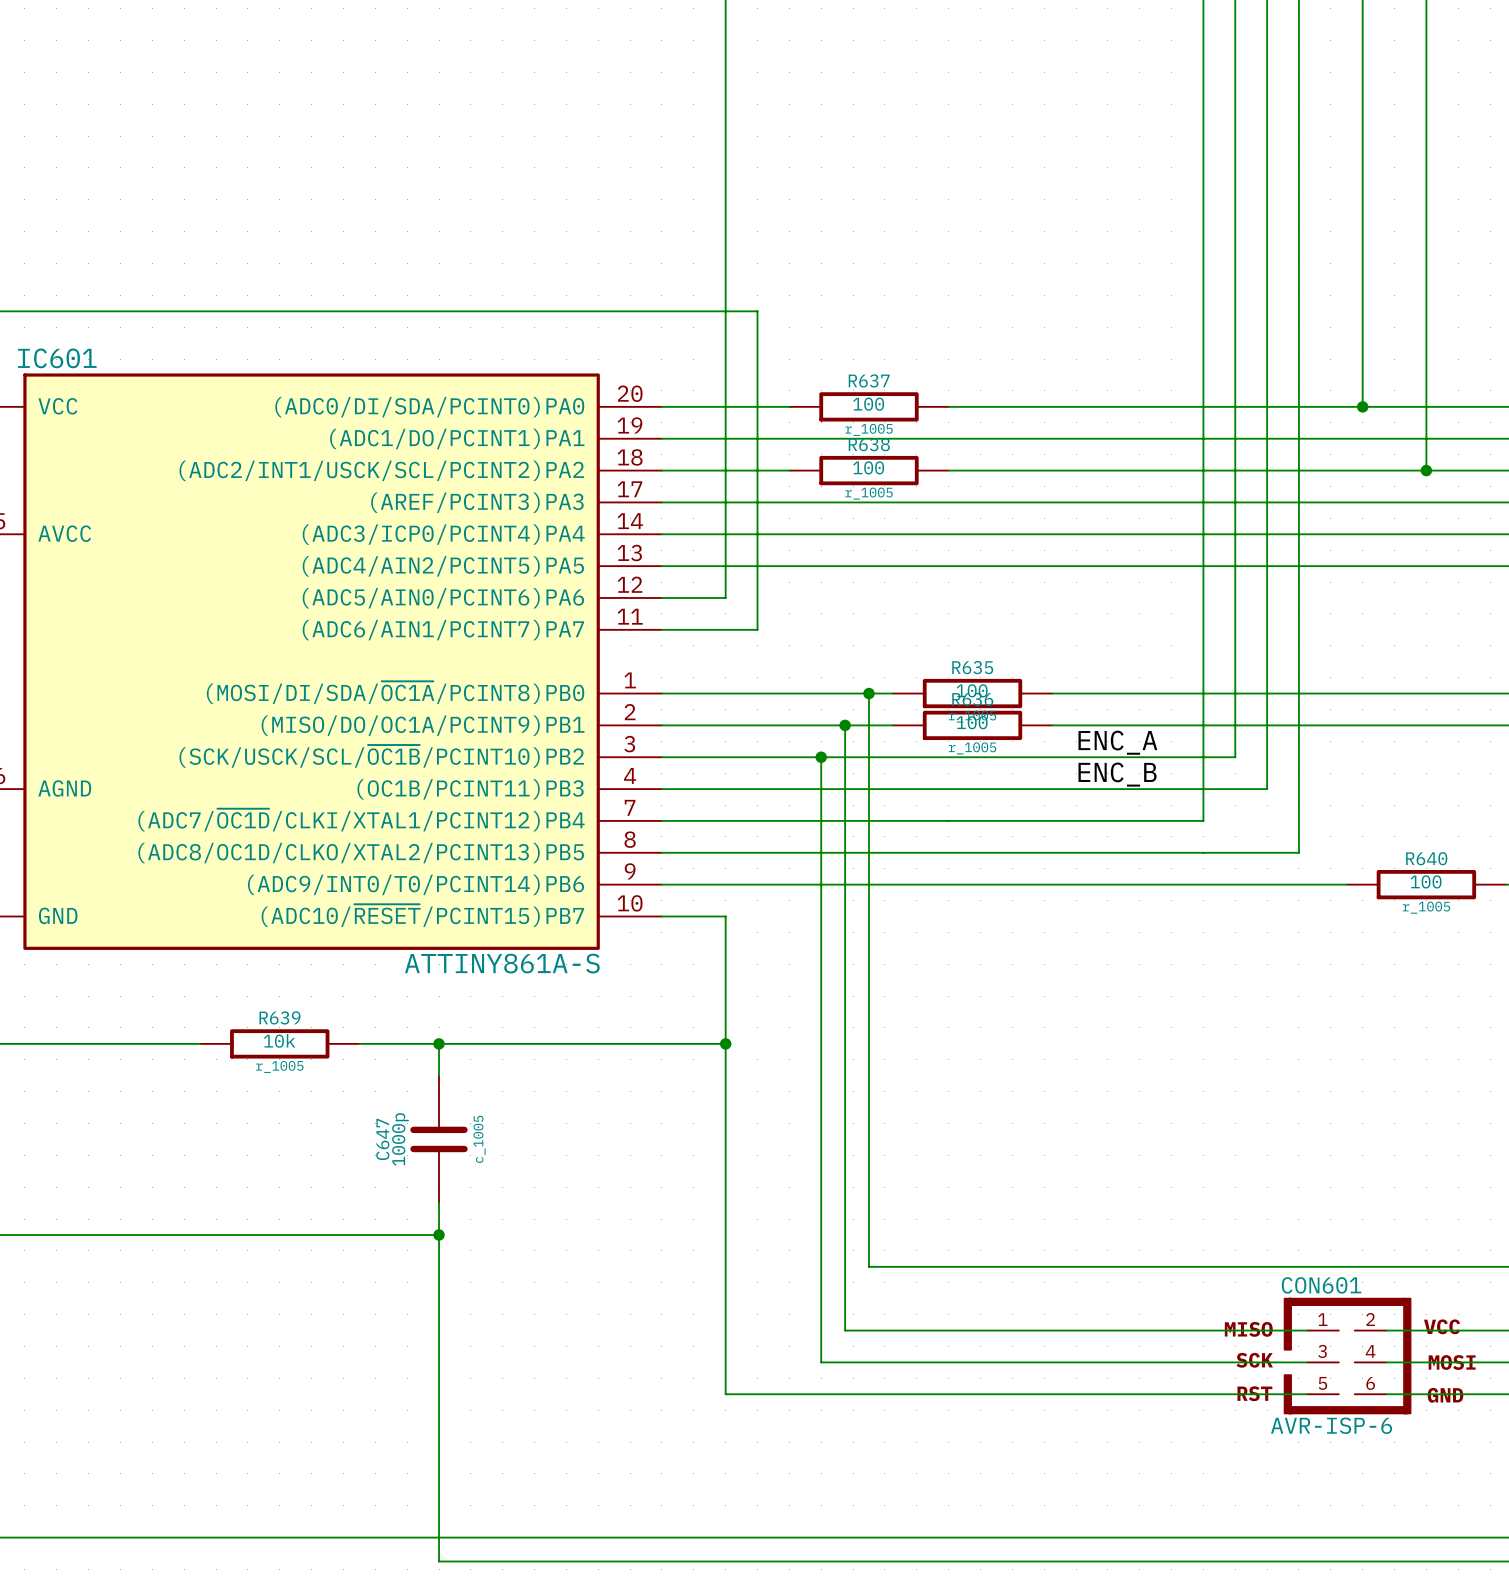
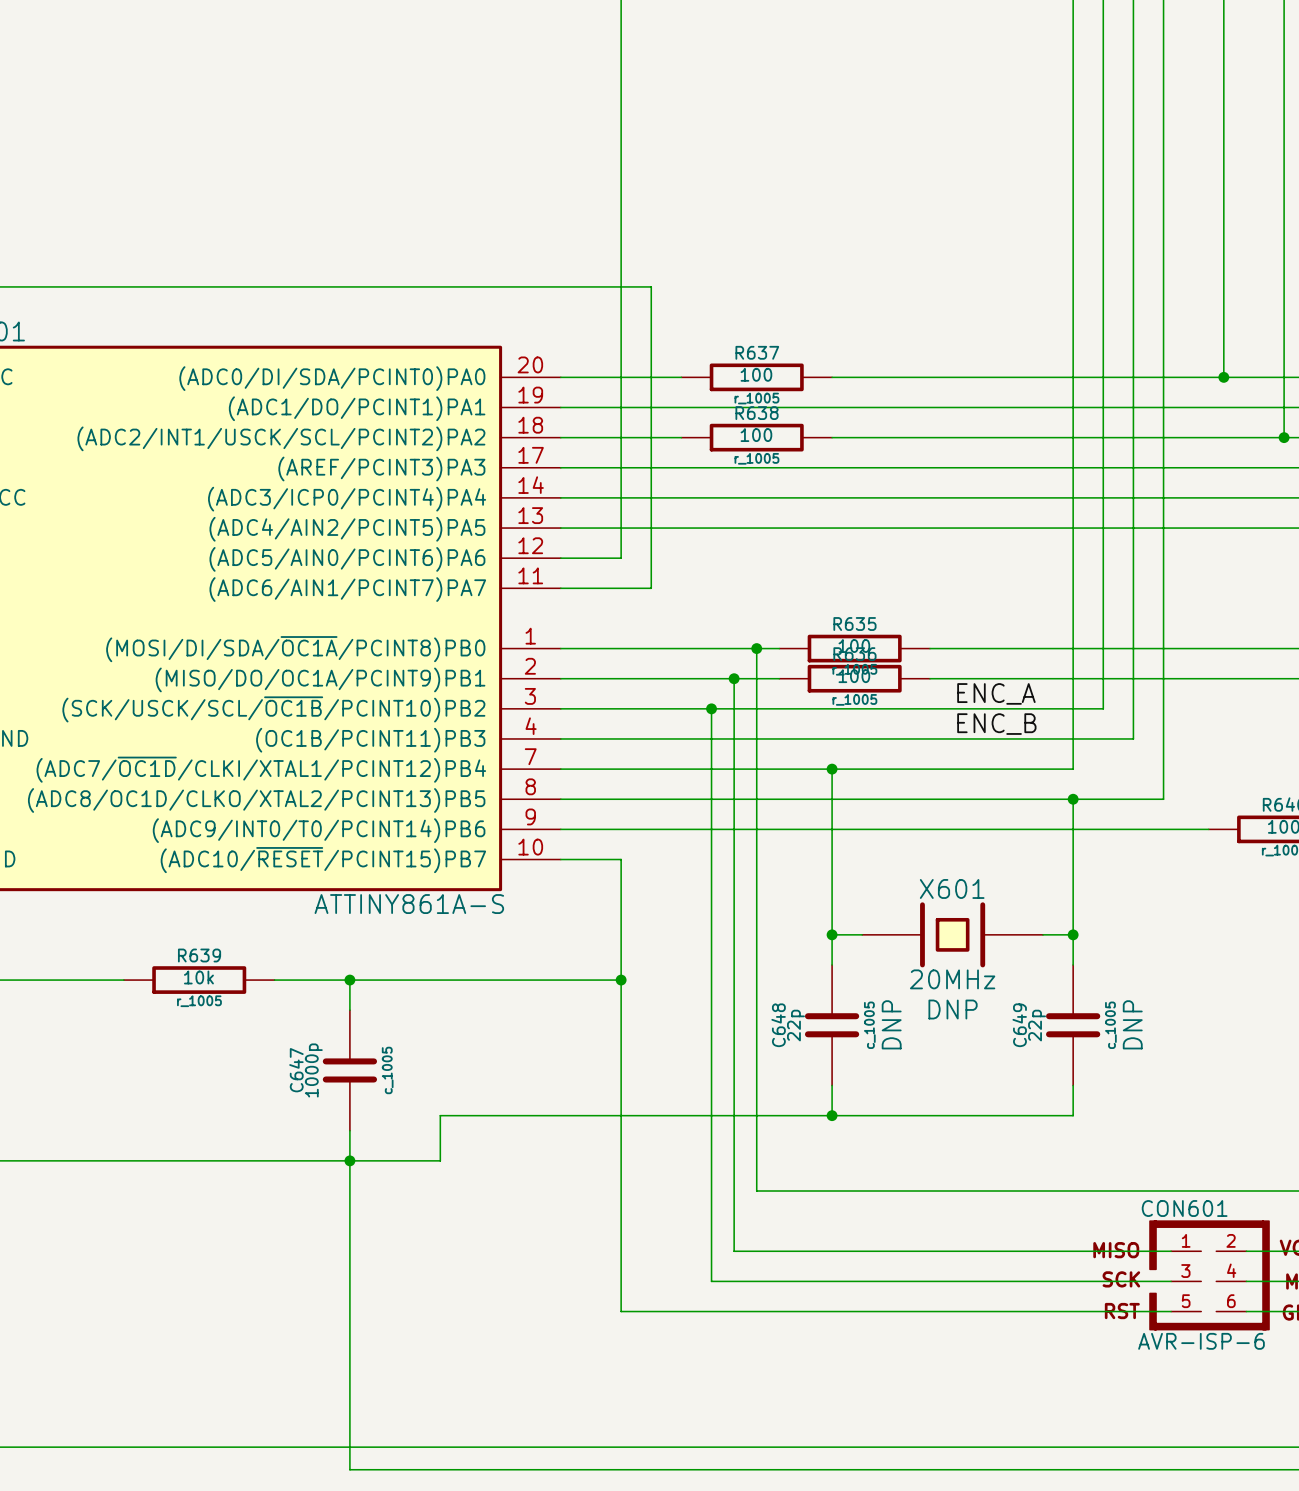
wire: none -> (832, 769) (832, 964)
junction: none -> (832, 769)
wire: none -> (1073, 799) (1073, 964)
junction: none -> (1073, 799)
wire: none -> (832, 934) (862, 934)
junction: none -> (832, 934)
X601: none -> 20MHz (952, 934)
wire: none -> (1043, 934) (1073, 934)
junction: none -> (1073, 934)
C648: none -> 22p (832, 1025)
C649: none -> 22p (1073, 1025)
wire: none -> (832, 1085) (832, 1115)
wire: none -> (1073, 1085) (1073, 1115) (440, 1115) (440, 1160) (349, 1160)
junction: none -> (832, 1115)

